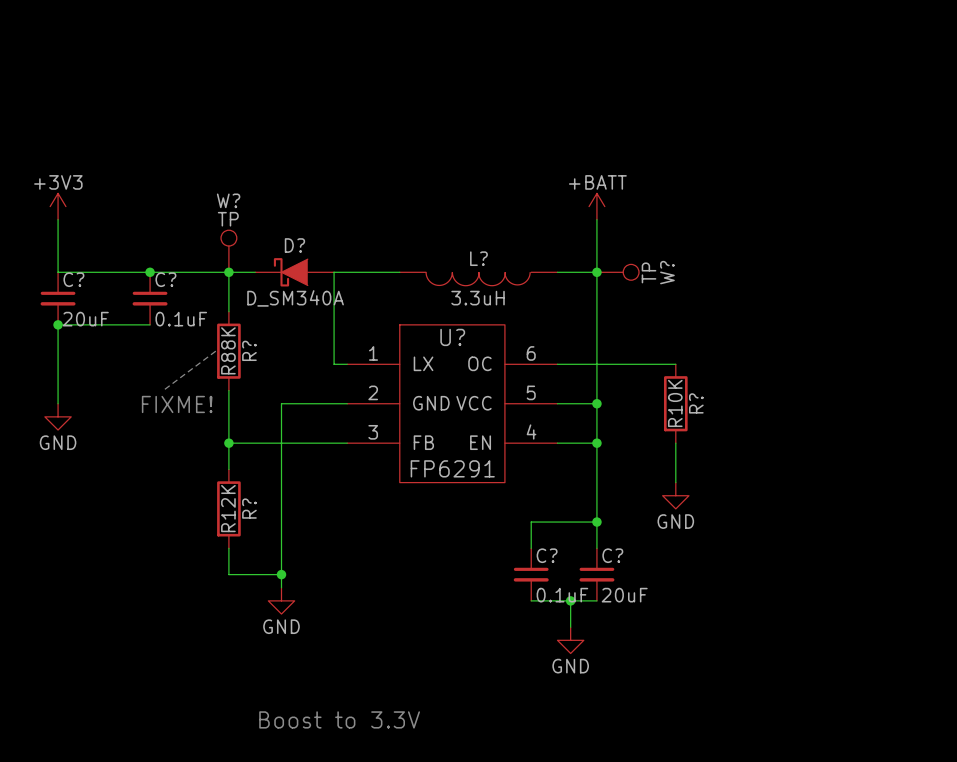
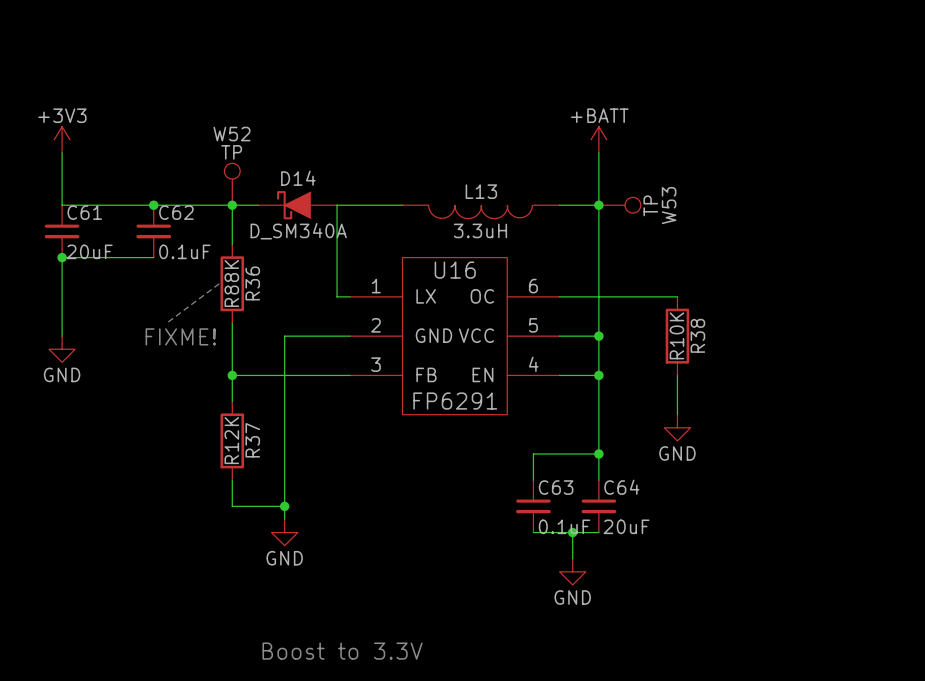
W? name: W? (228, 200) -> W52 (231, 134)
D? name: D? (294, 245) -> D14 (298, 178)
L? name: L? (478, 258) -> L13 (481, 191)
W? name: W? (667, 272) -> W53 (669, 205)
C? name: C? (73, 279) -> C61 (84, 212)
C? name: C? (165, 279) -> C62 (176, 212)
U? name: U? (452, 337) -> U16 (455, 270)
R? name: R? (249, 350) -> R36 (252, 283)
R? name: R? (696, 403) -> R38 (697, 335)
R? name: R? (249, 508) -> R37 (252, 440)
C? name: C? (547, 555) -> C63 (556, 487)
C? name: C? (612, 555) -> C64 (621, 487)

